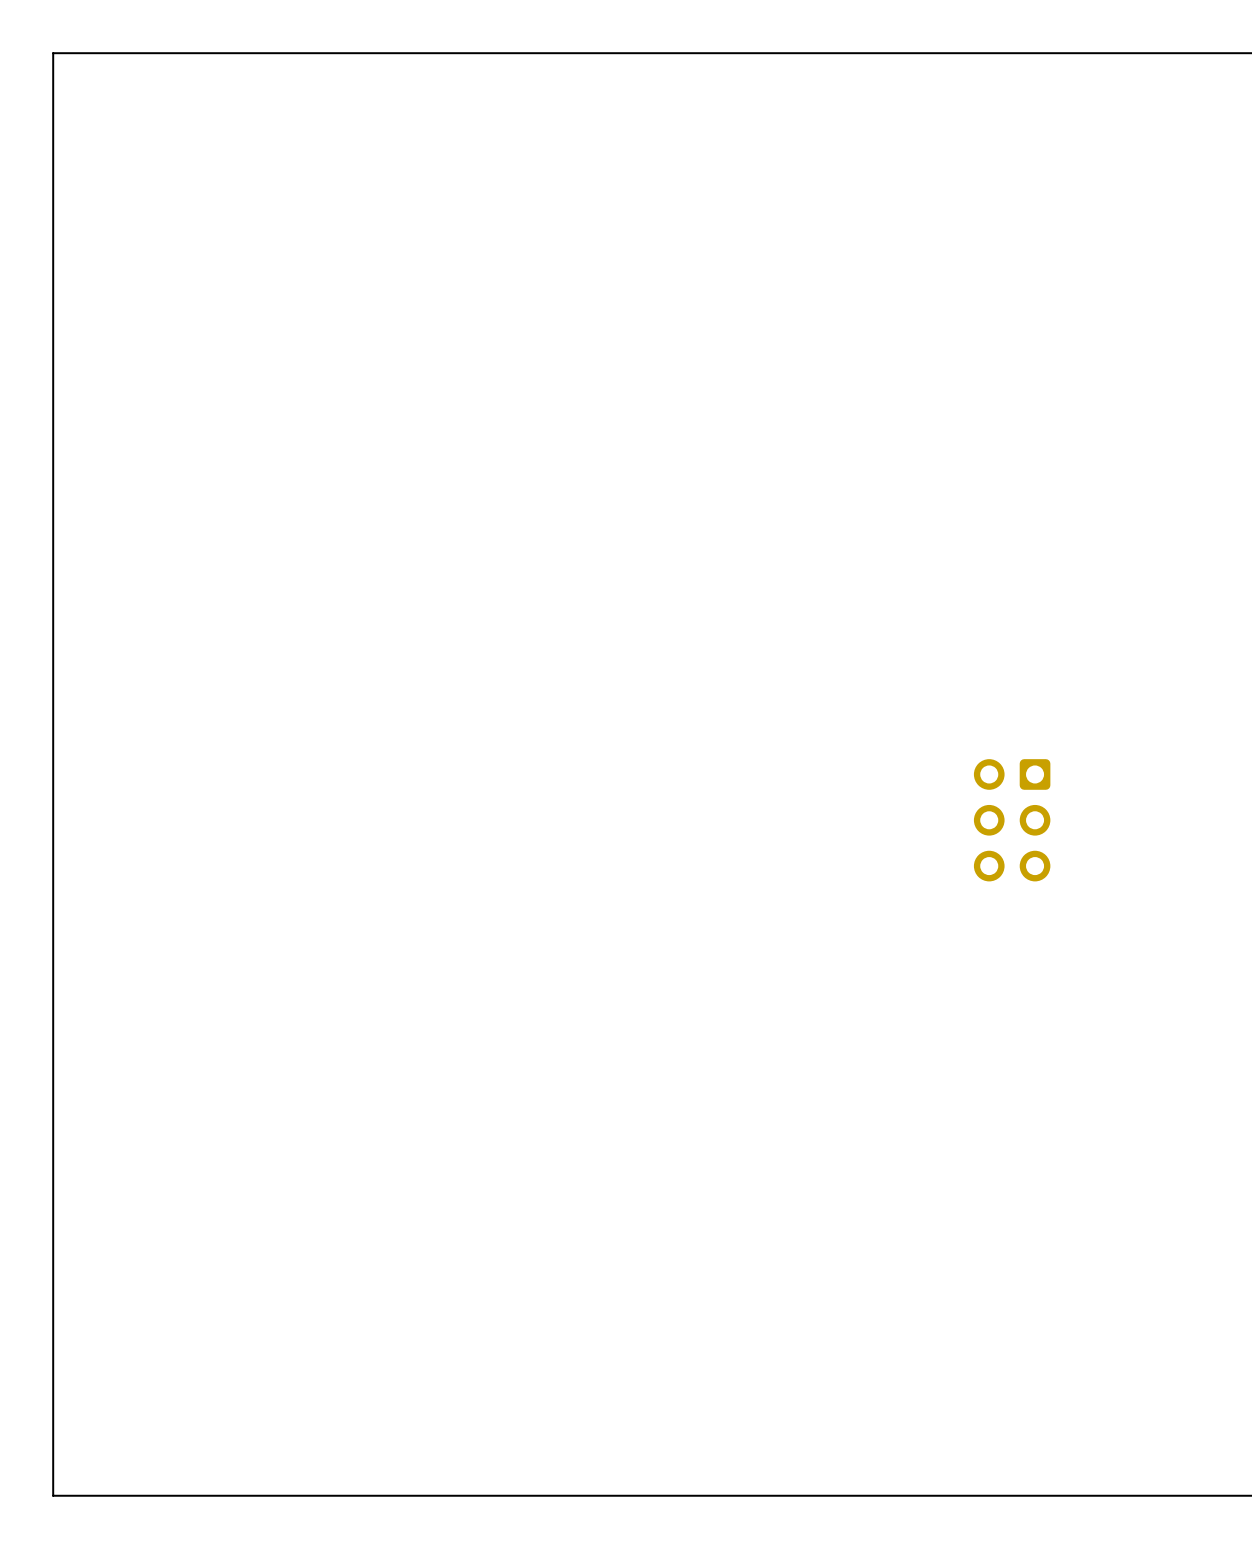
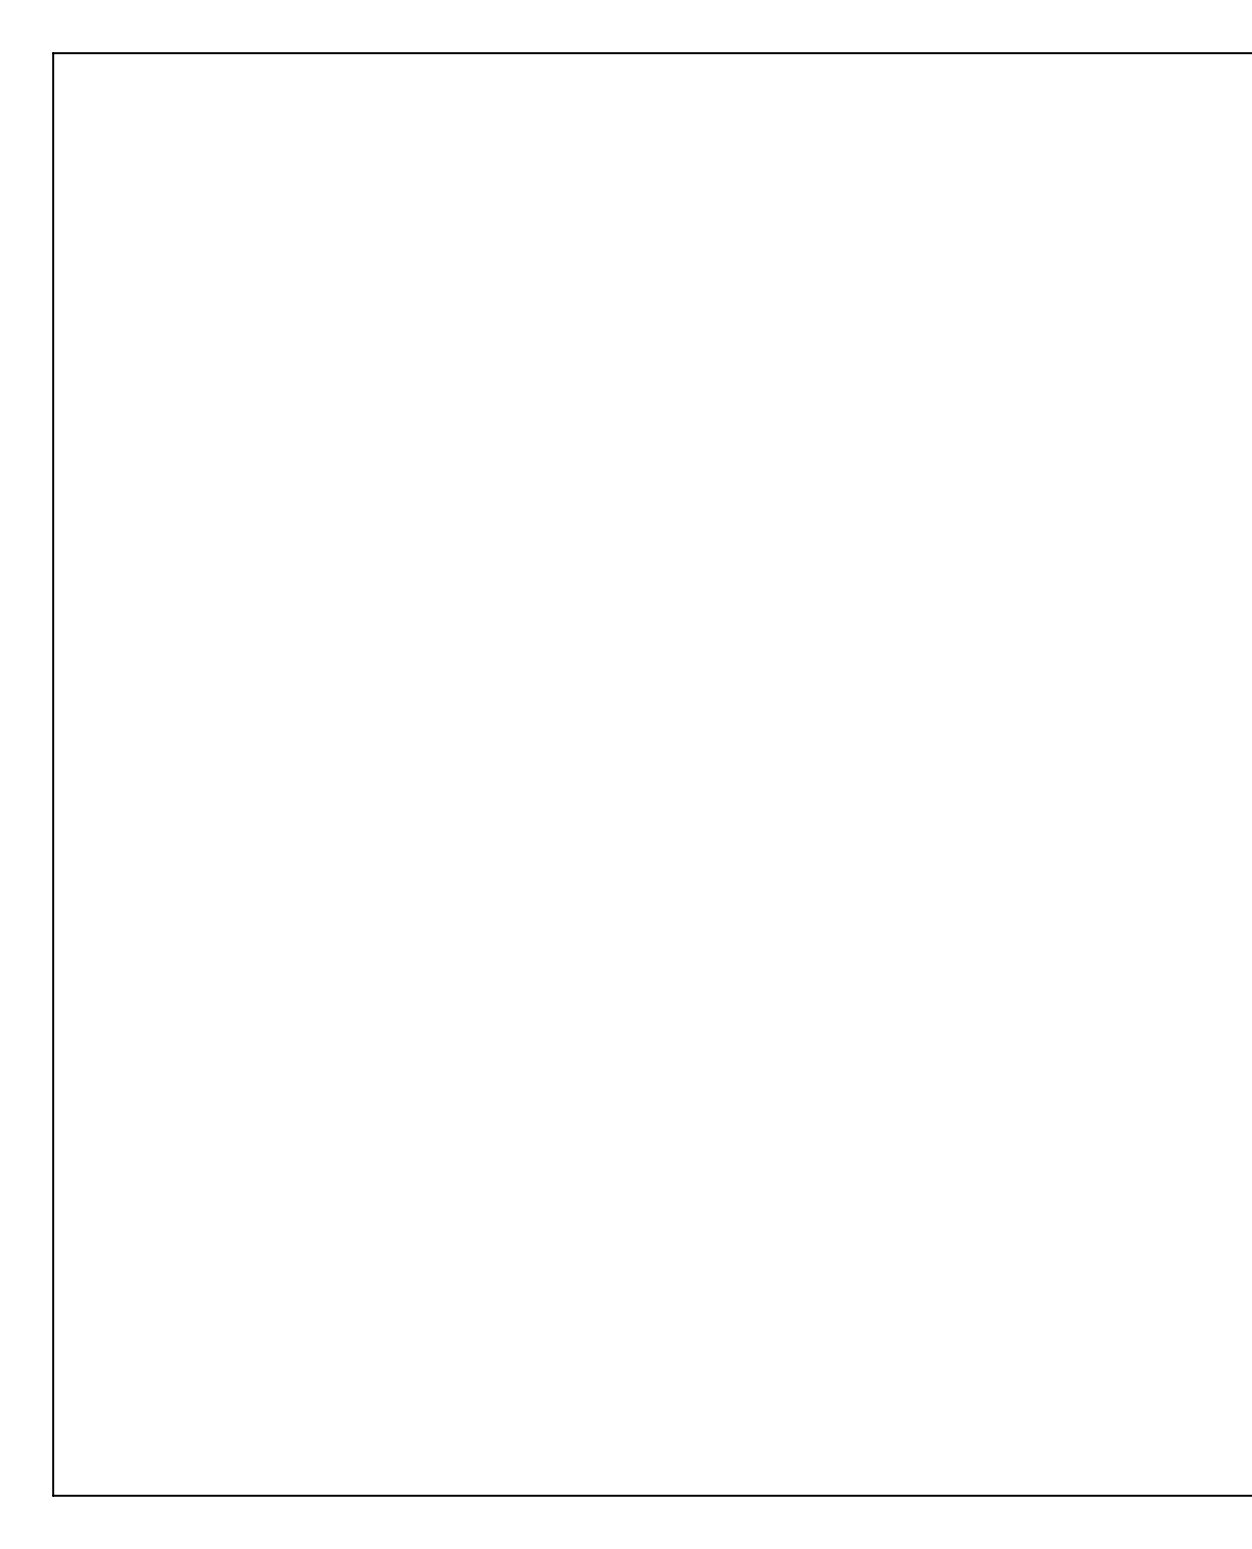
part: (1012, 820) -> none

